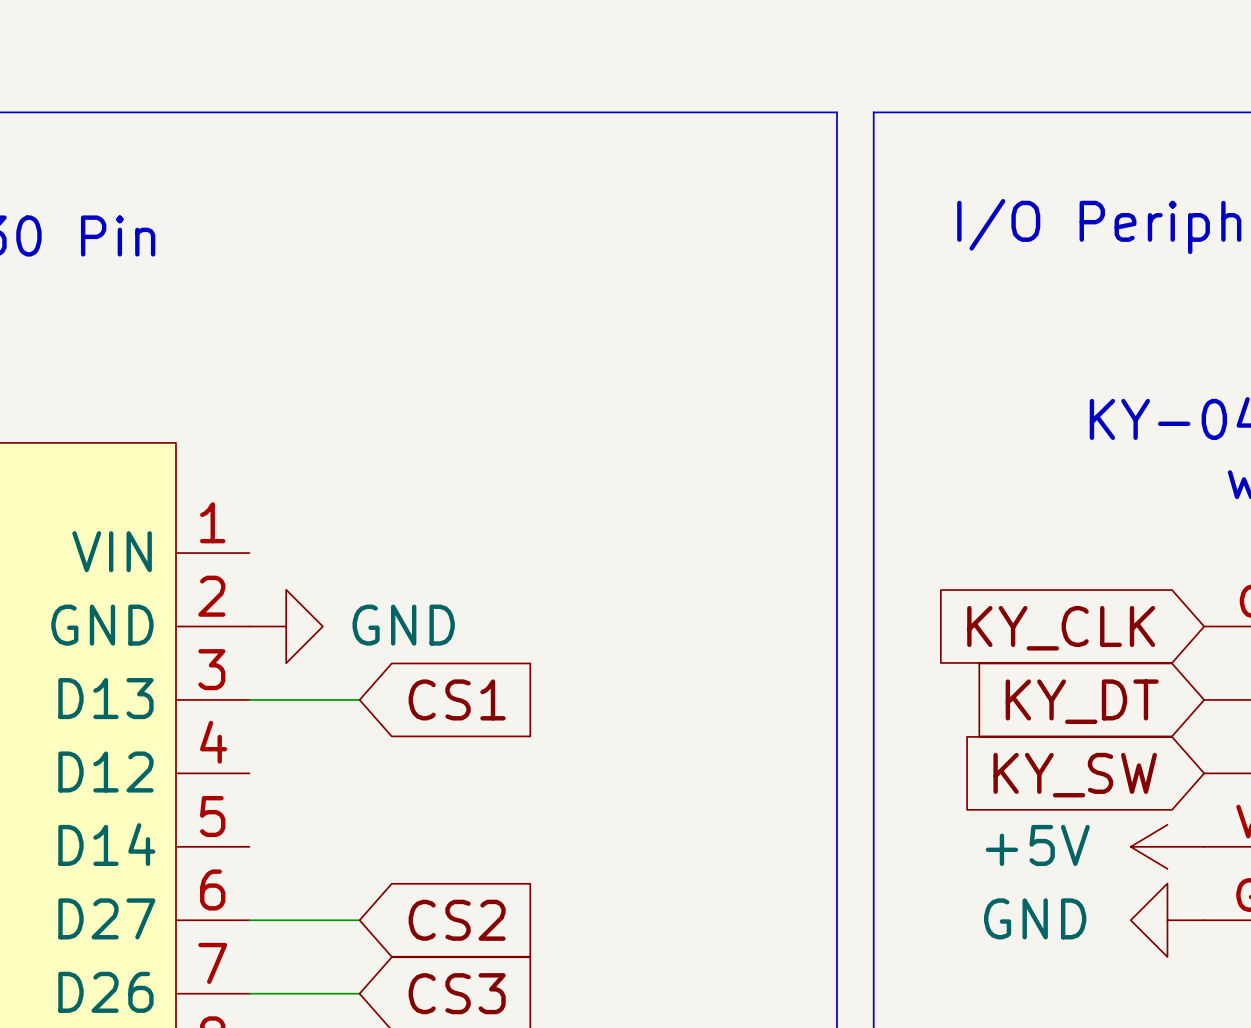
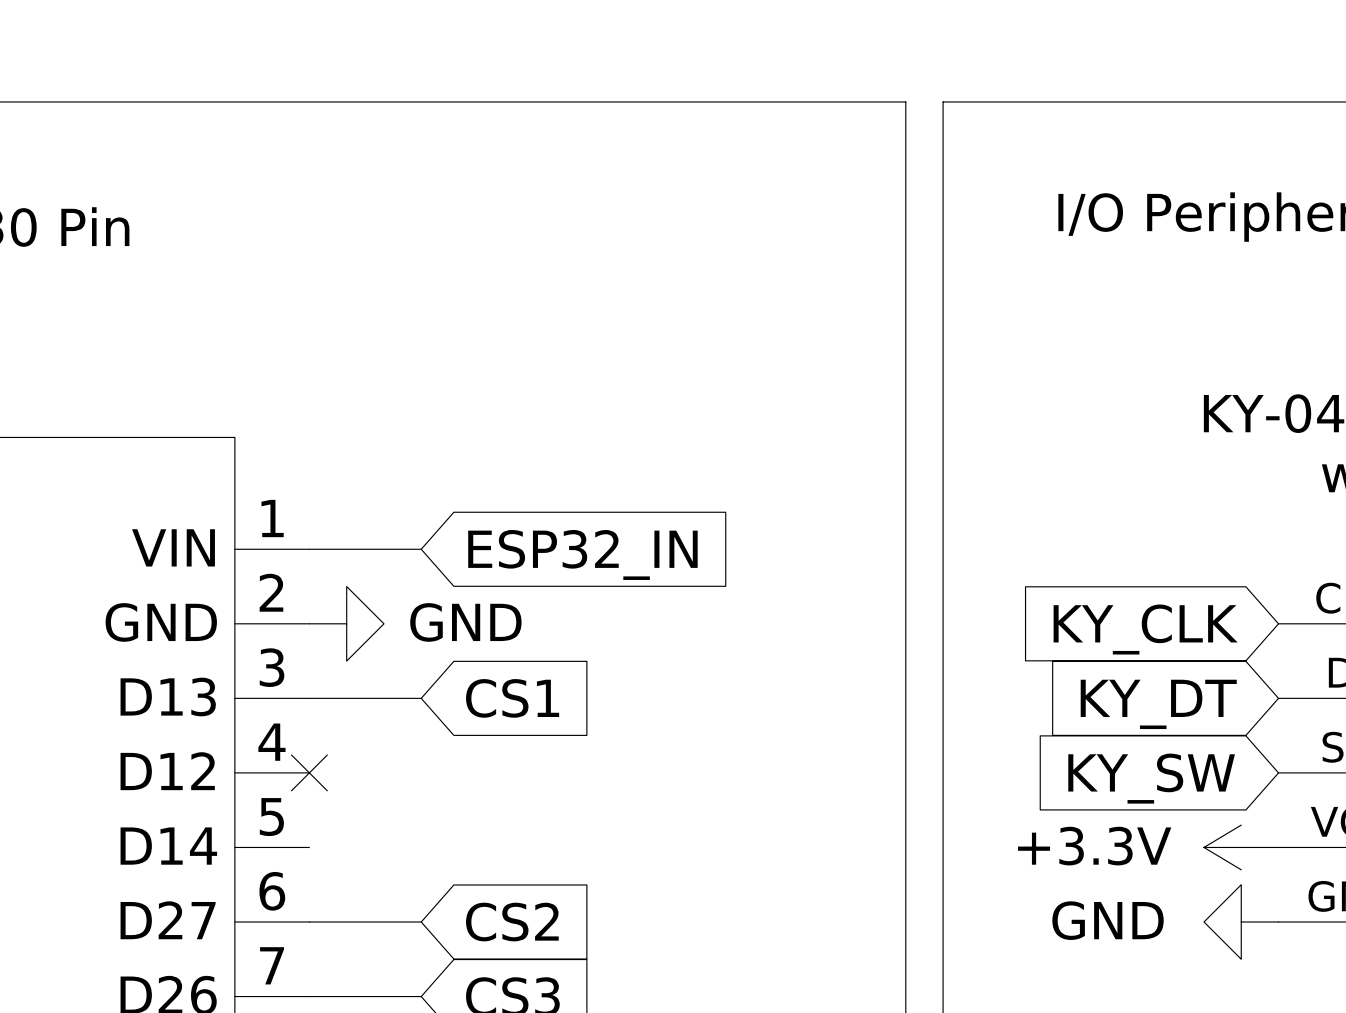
wire: none -> (309, 549) (421, 549)
global label: none -> ESP32_IN (582, 554)
no-connect mark: none -> (309, 772)
power symbol: +5V (1167, 846) -> +3.3V (1241, 847)

